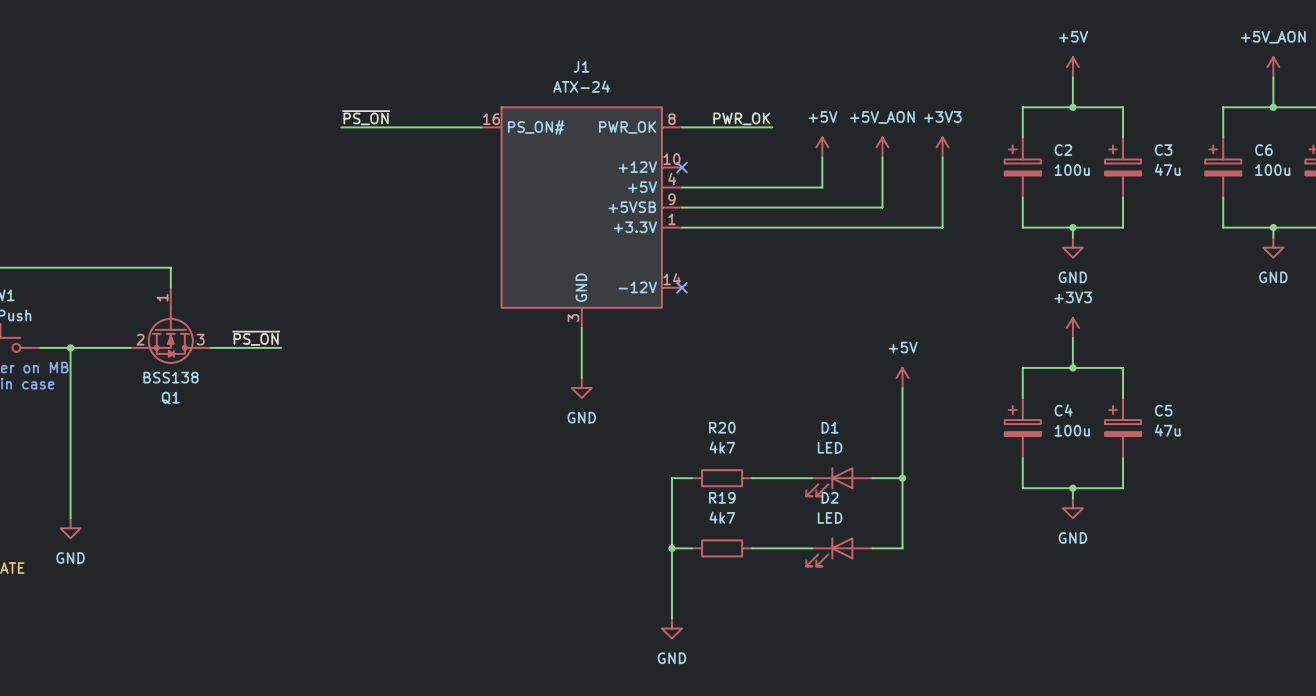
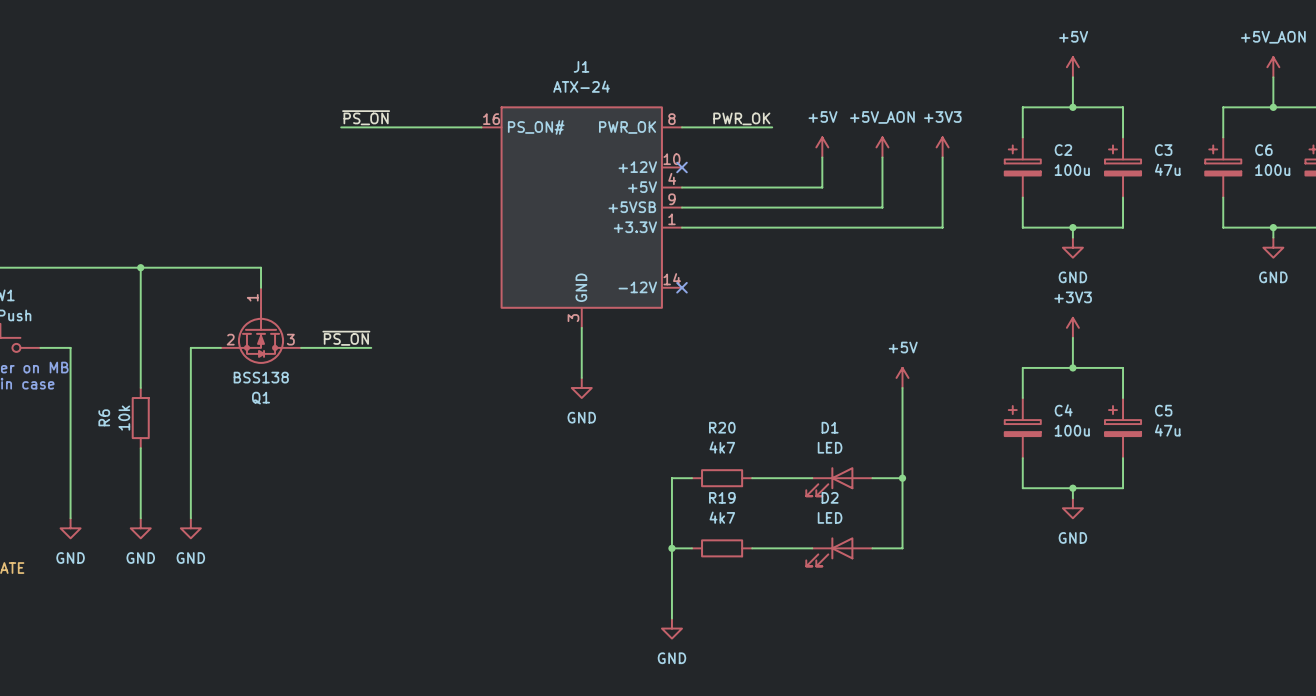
wire: none -> (140, 267) (140, 387)
junction: none -> (140, 267)
wire: (170, 267) (170, 287) -> (170, 267) (261, 267) (261, 287)
Q1 position: (170, 325) -> (261, 325)
label position: ~{PS_ON} (256, 338) -> ~{PS_ON} (346, 338)
wire: (70, 347) (130, 347) -> none
junction: (70, 347) -> none
wire: none -> (210, 347) (190, 347) (190, 518)
wire: none -> (301, 347) (371, 347)
R6: none -> 10k (140, 418)
wire: none -> (140, 448) (140, 518)
power symbol: none -> GND (140, 528)
power symbol: none -> GND (190, 528)

